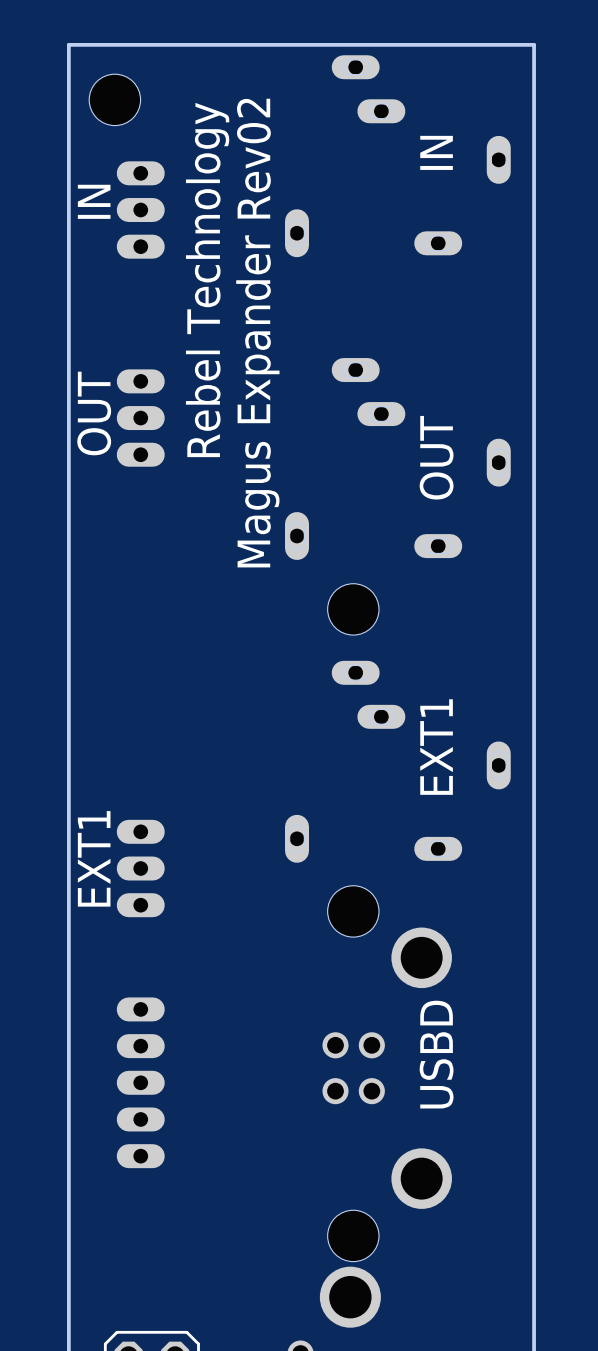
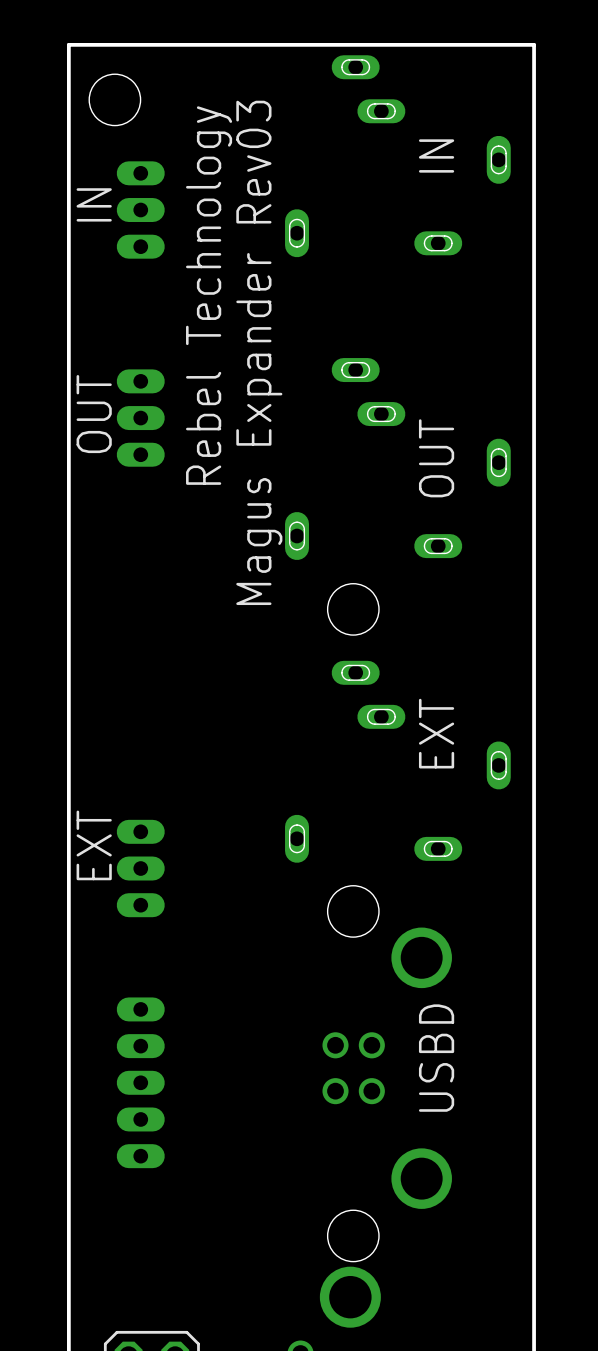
text: Magus Expander Rev02 (257, 333) -> Magus Expander Rev03 (259, 352)
text: EXT1 (436, 747) -> EXT (436, 733)
text: EXT1 (94, 858) -> EXT (94, 845)

